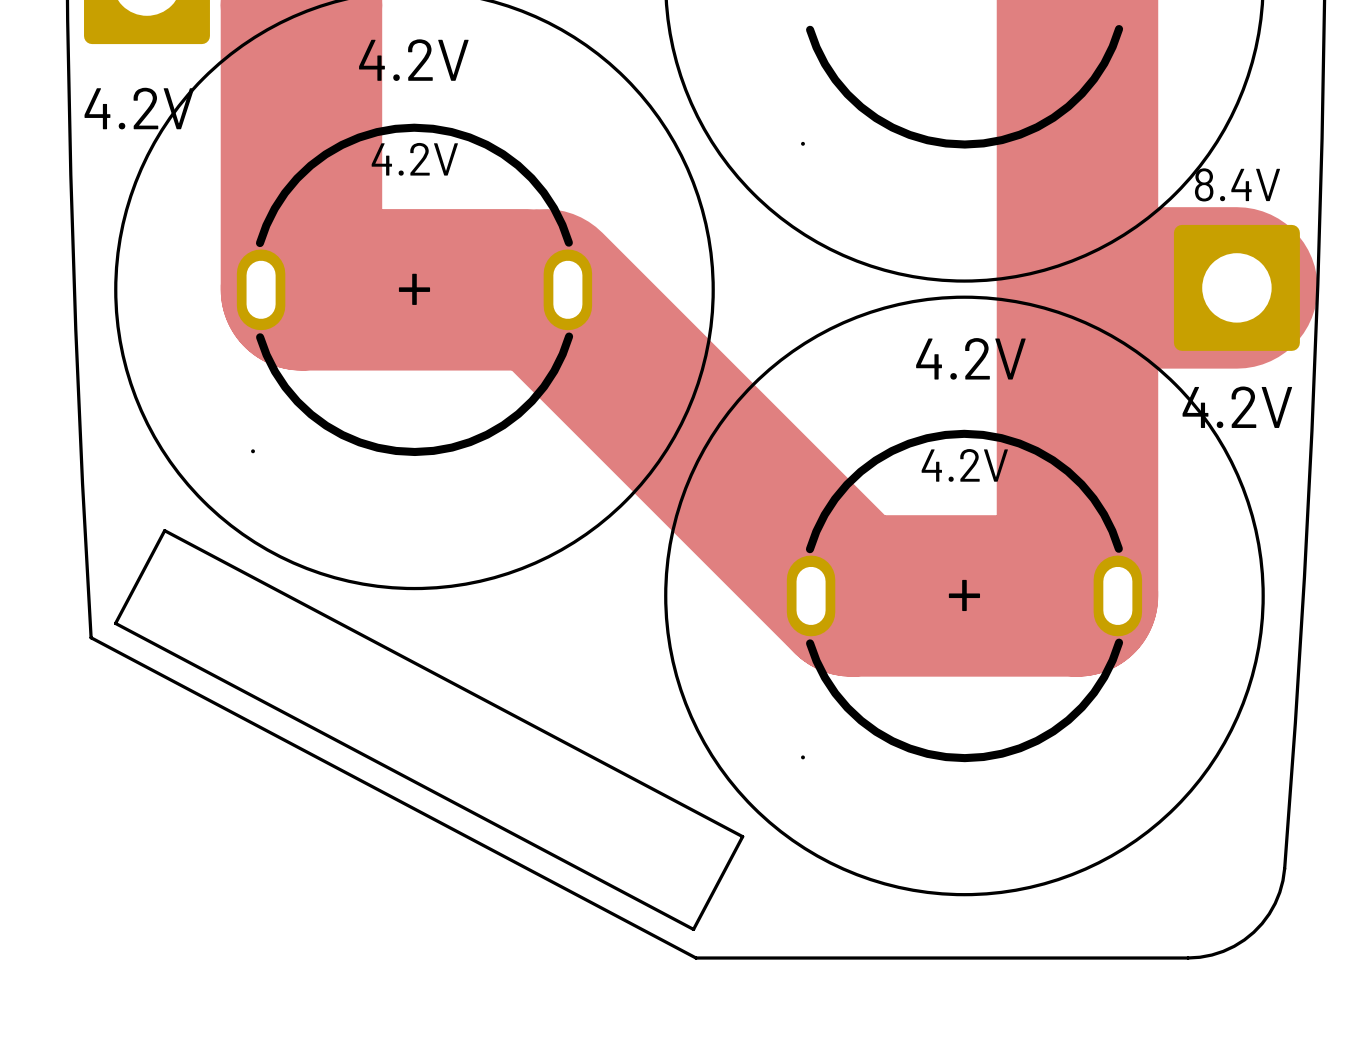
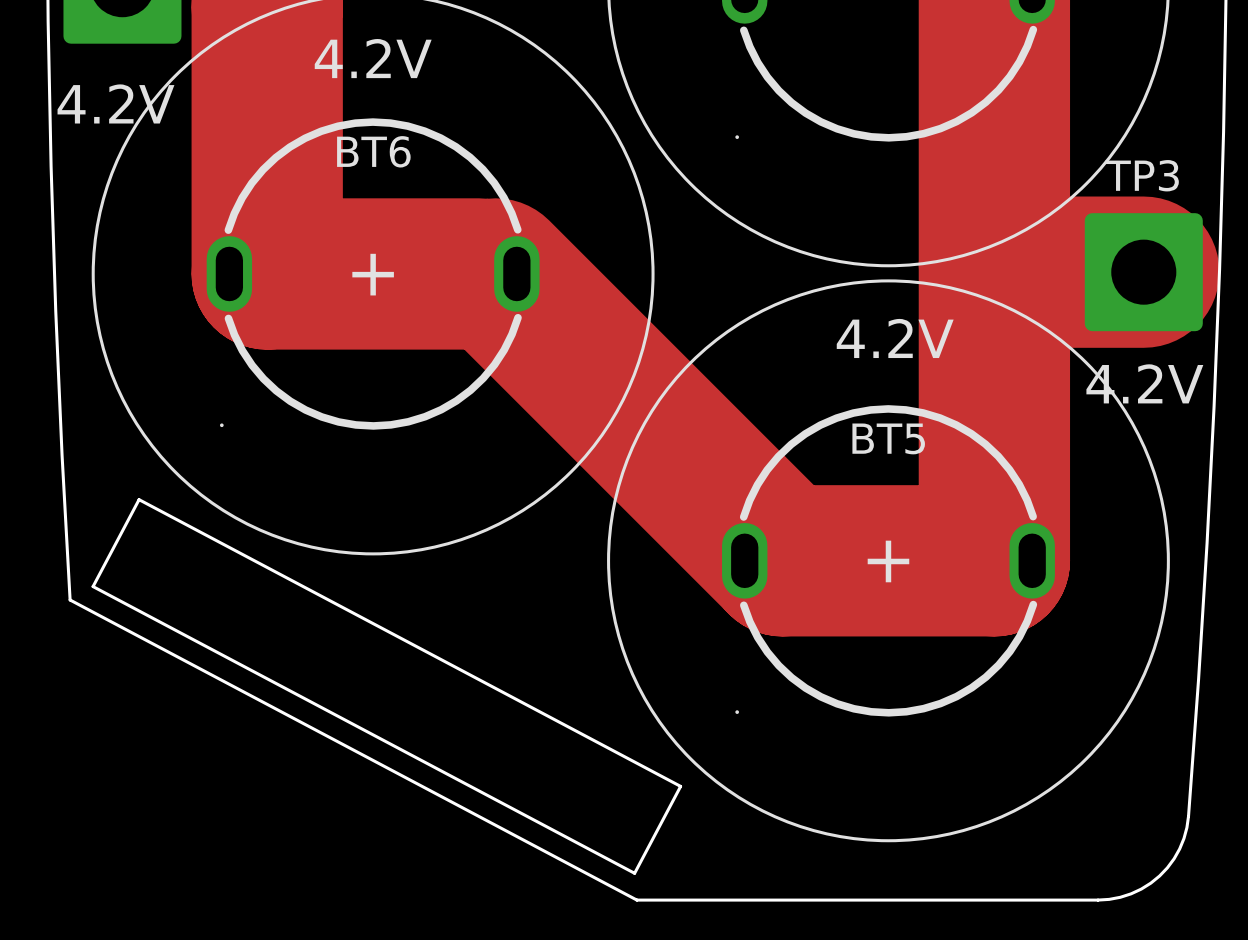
4.2V name: 4.2V (414, 159) -> BT6 (373, 151)
8.4V name: 8.4V (1237, 184) -> TP3 (1142, 175)
4.2V name: 4.2V (964, 465) -> BT5 (888, 438)

